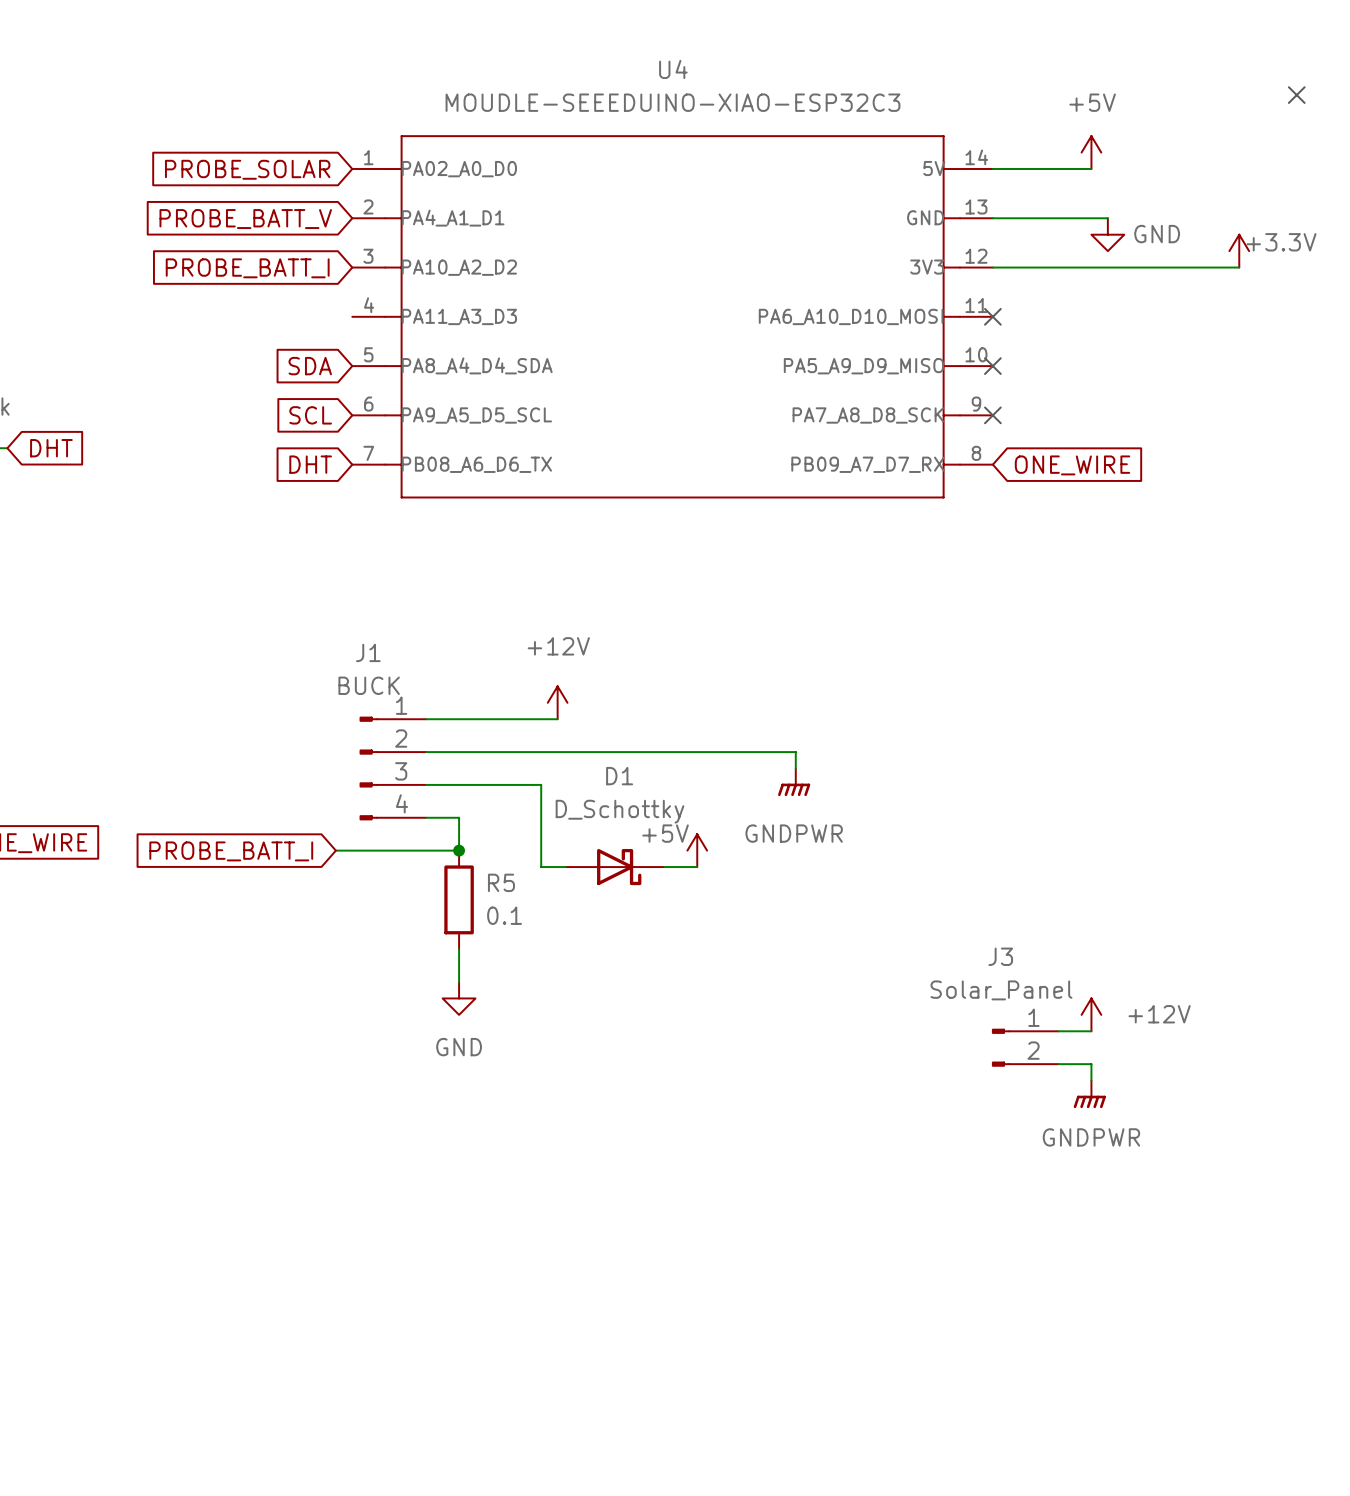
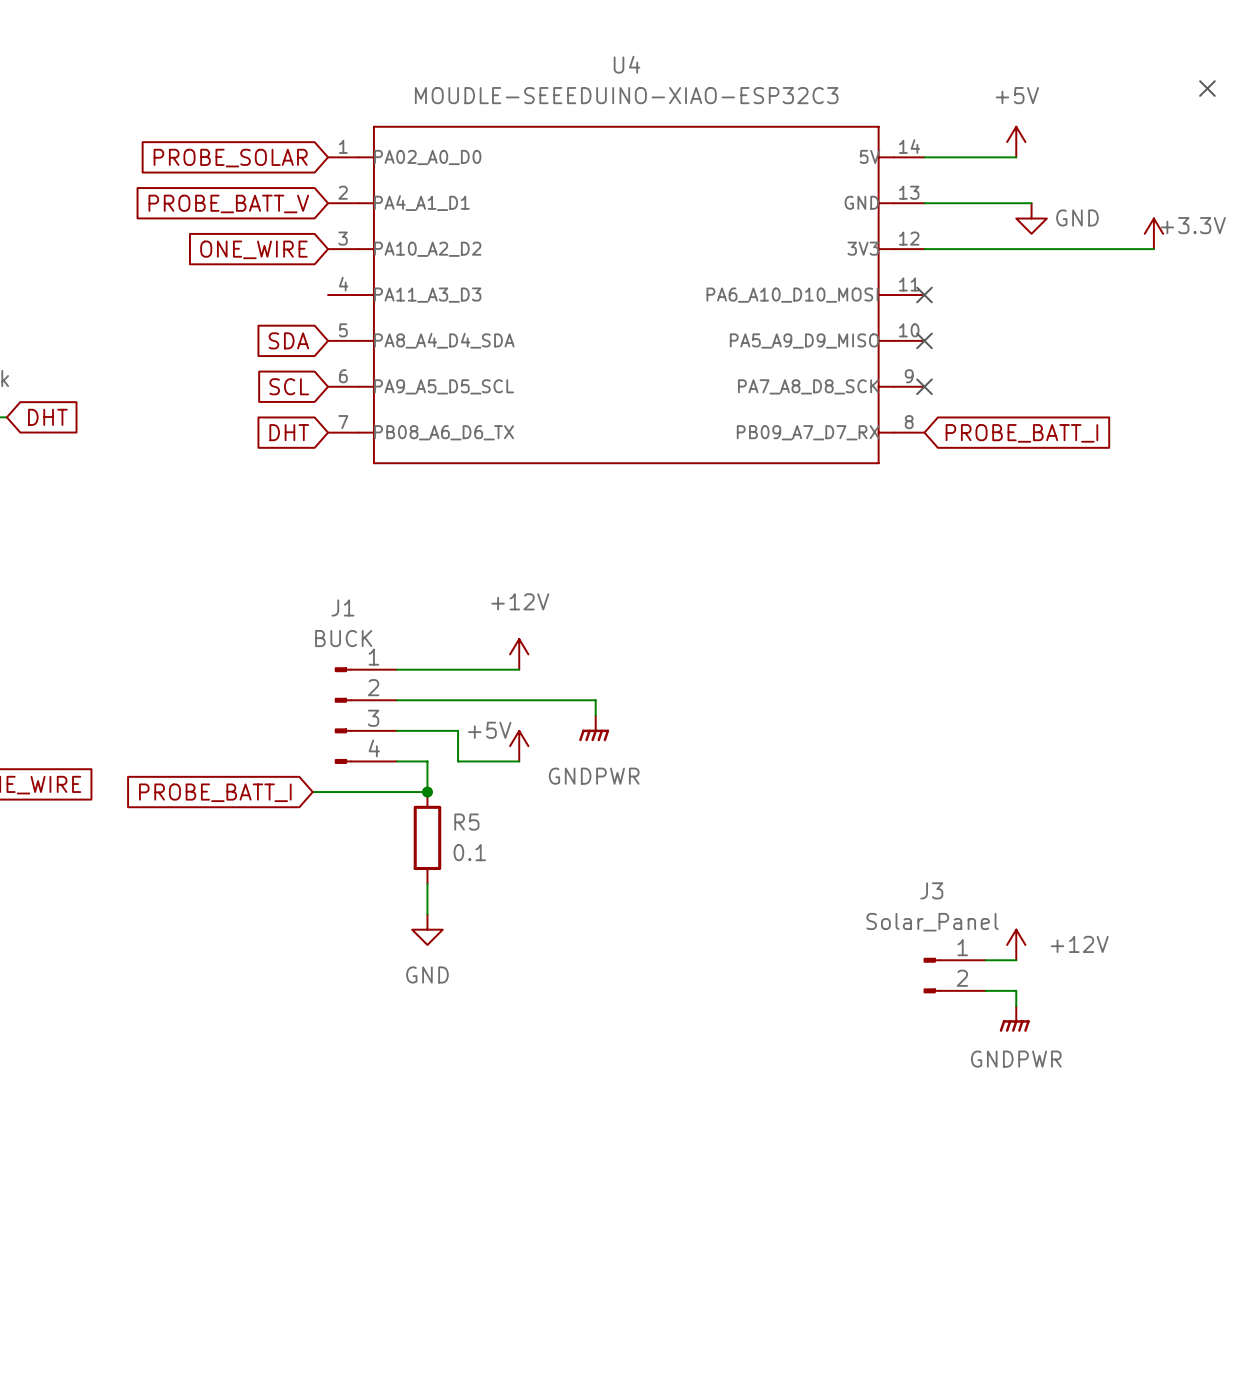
global label: PROBE_BATT_I (247, 268) -> ONE_WIRE (253, 249)
global label: ONE_WIRE (1072, 465) -> PROBE_BATT_I (1021, 433)
wire: (639, 752) (795, 752) (795, 768) -> (595, 700) (595, 715)
power symbol position: GNDPWR (794, 782) -> GNDPWR (594, 728)
wire: (491, 784) (541, 784) (541, 867) (565, 867) -> (458, 730) (458, 761) (519, 761)
power symbol position: +5V (697, 850) -> +5V (519, 746)
D1: D_Schottky (615, 867) -> none
wire: (664, 867) (697, 867) -> none

